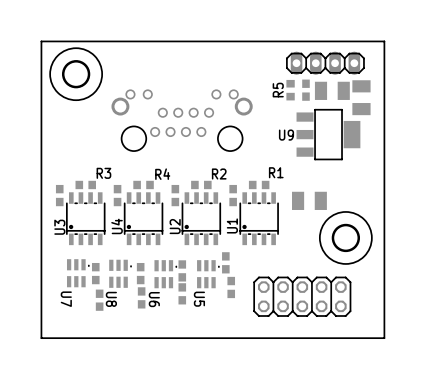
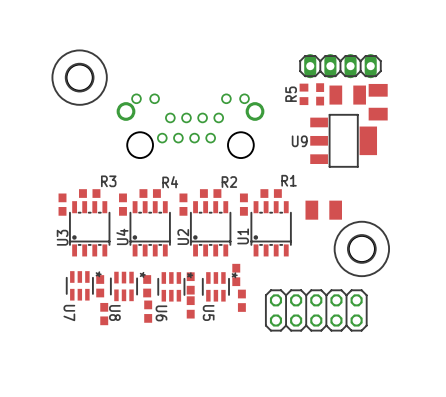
board edge: (41, 41) (384, 41) (384, 338) (41, 338) (41, 41) -> none
U7 footprint: [66, 259, 90, 288] -> [66, 271, 94, 301]
U8 footprint: [109, 259, 132, 288] -> [110, 271, 138, 302]
U6 footprint: [154, 260, 177, 289] -> [157, 272, 186, 302]
U5 footprint: [197, 260, 220, 289] -> [202, 272, 230, 302]

